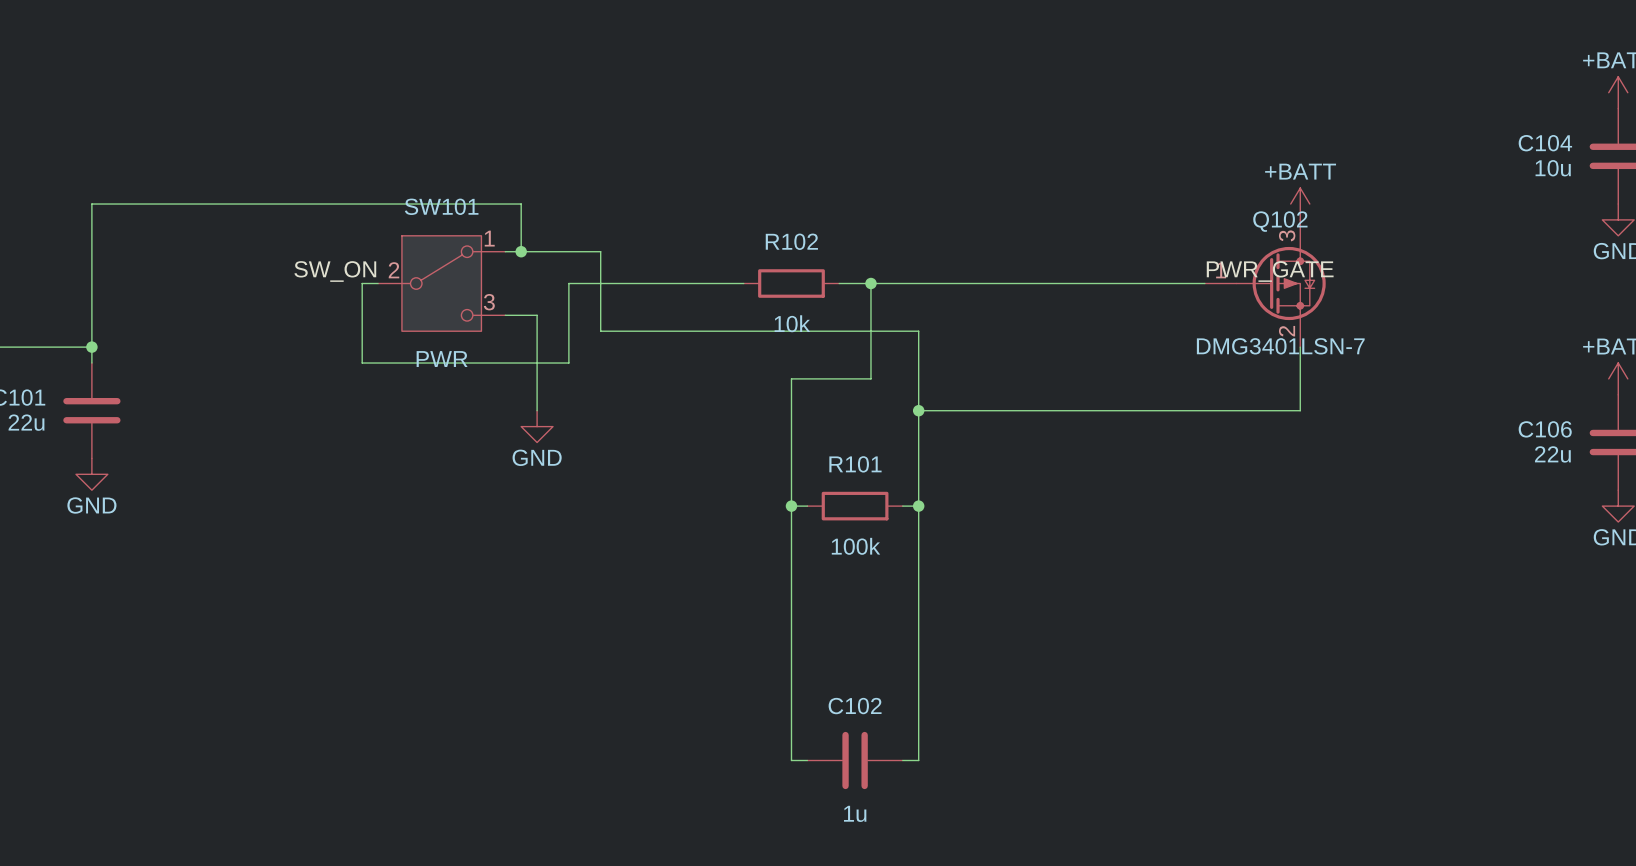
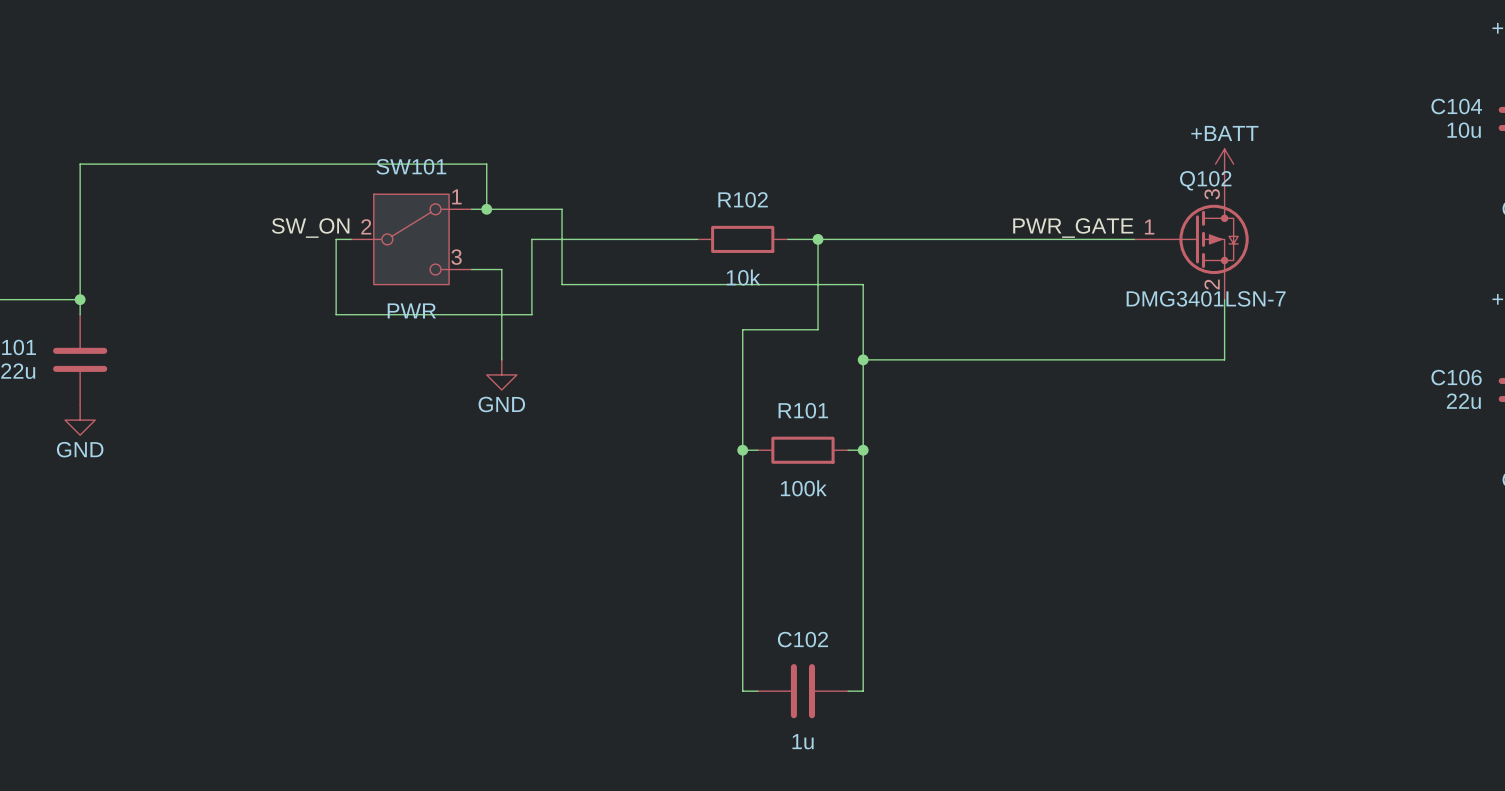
label position: PWR_GATE (1270, 271) -> PWR_GATE (1073, 228)

